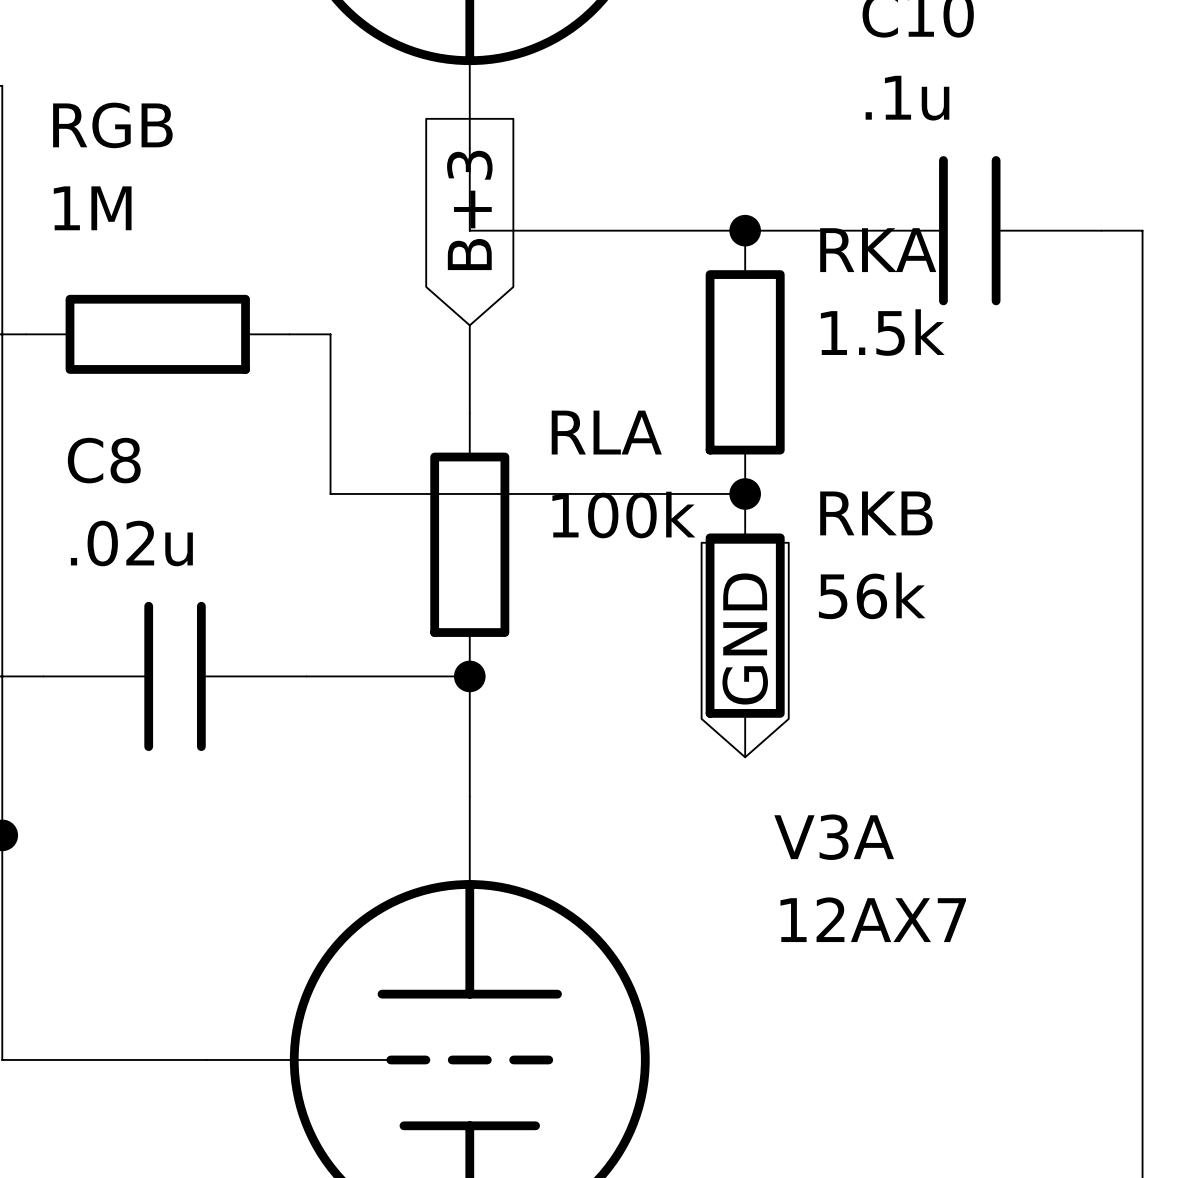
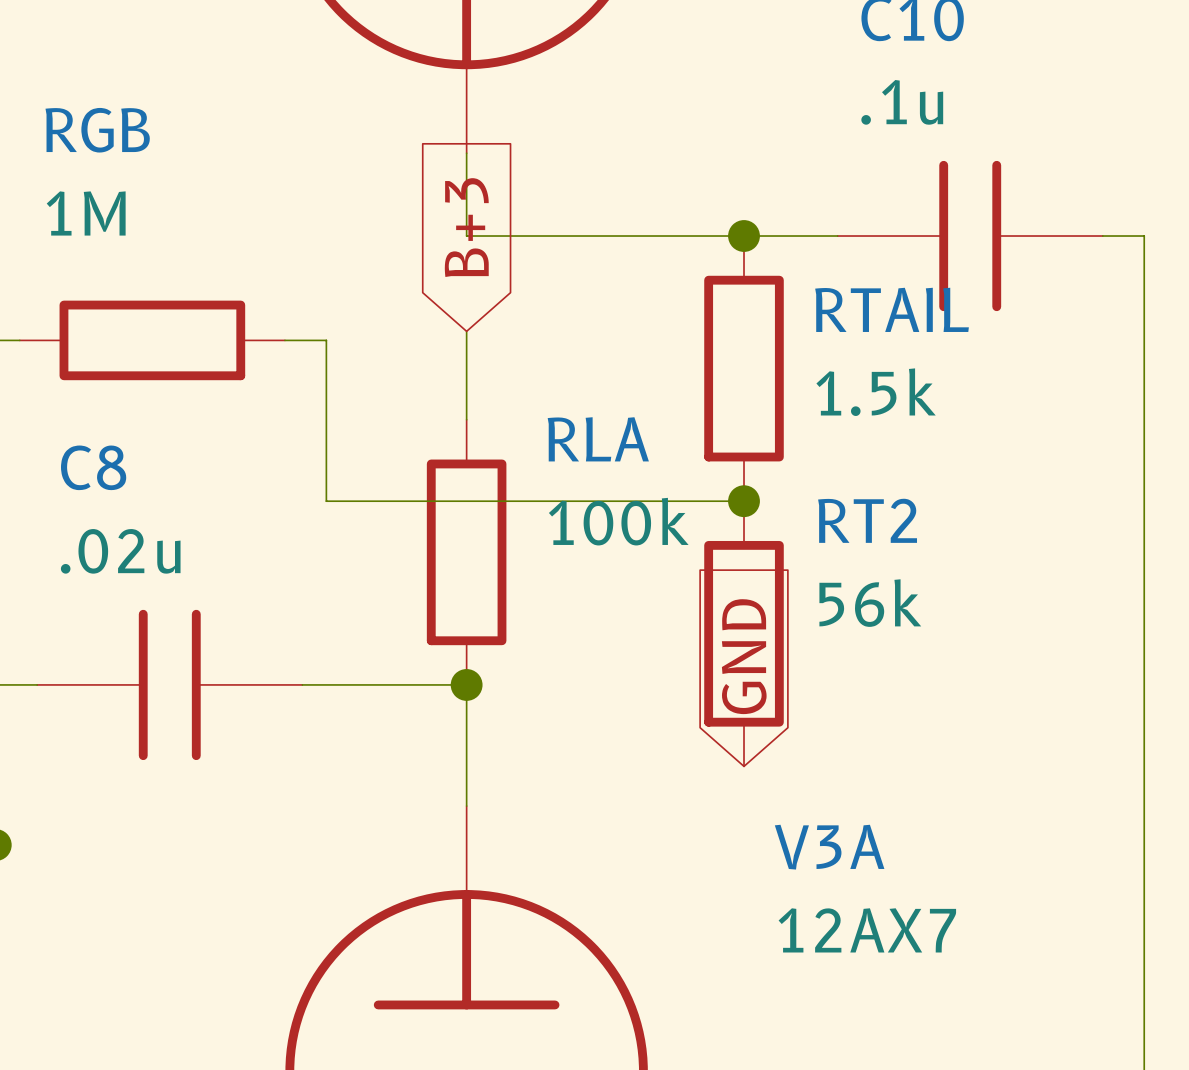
RKA name: RKA (878, 250) -> RTAIL (892, 309)
RKA value position: 1.5k (882, 332) -> 1.5k (876, 392)
RKB name: RKB (876, 513) -> RT2 (867, 520)

